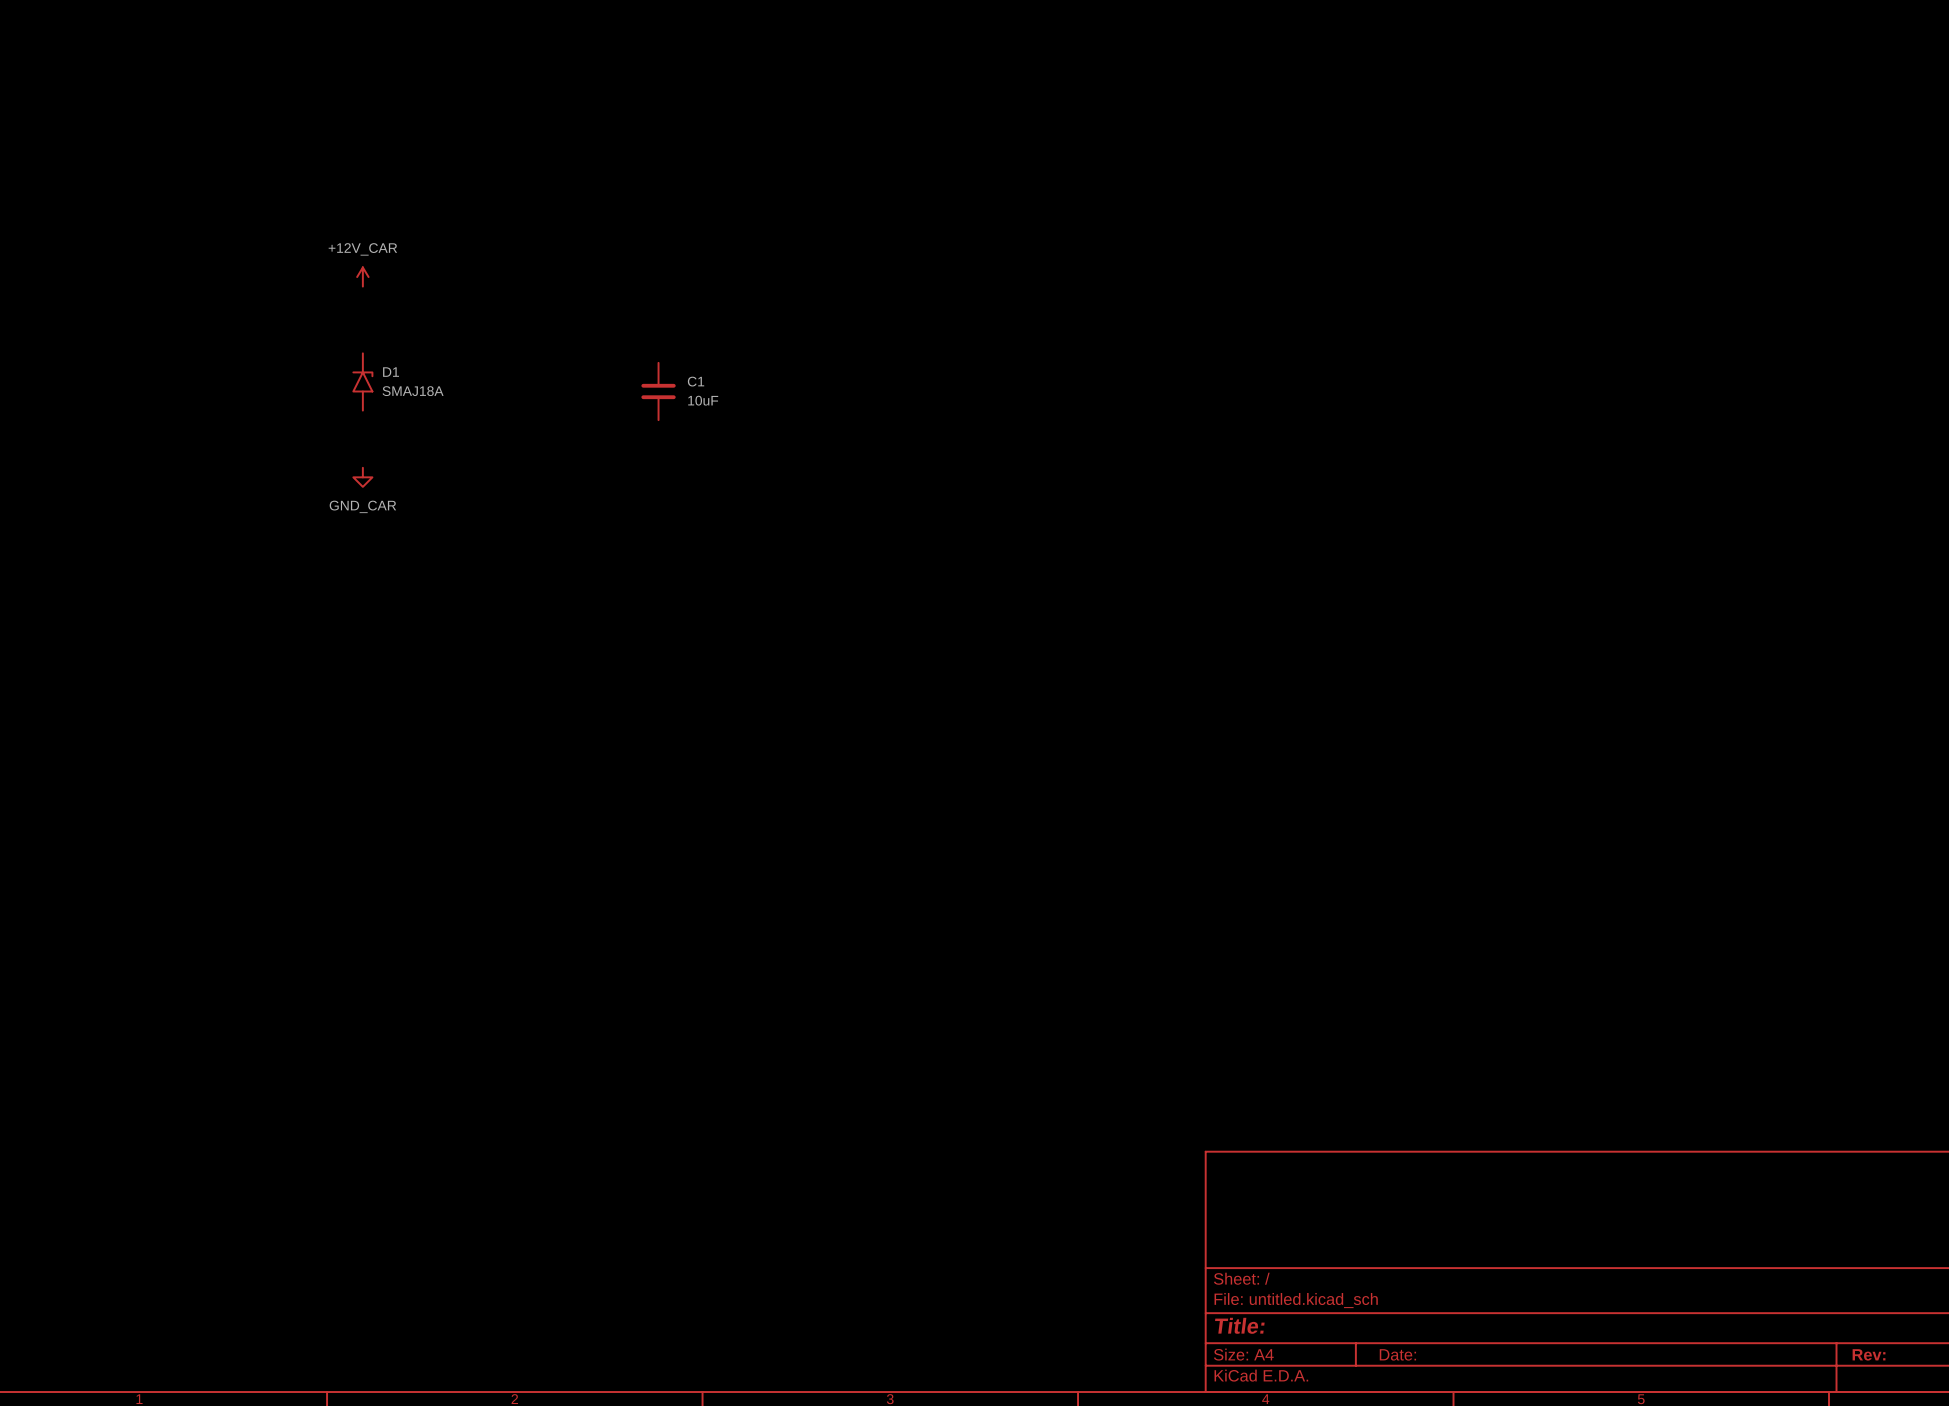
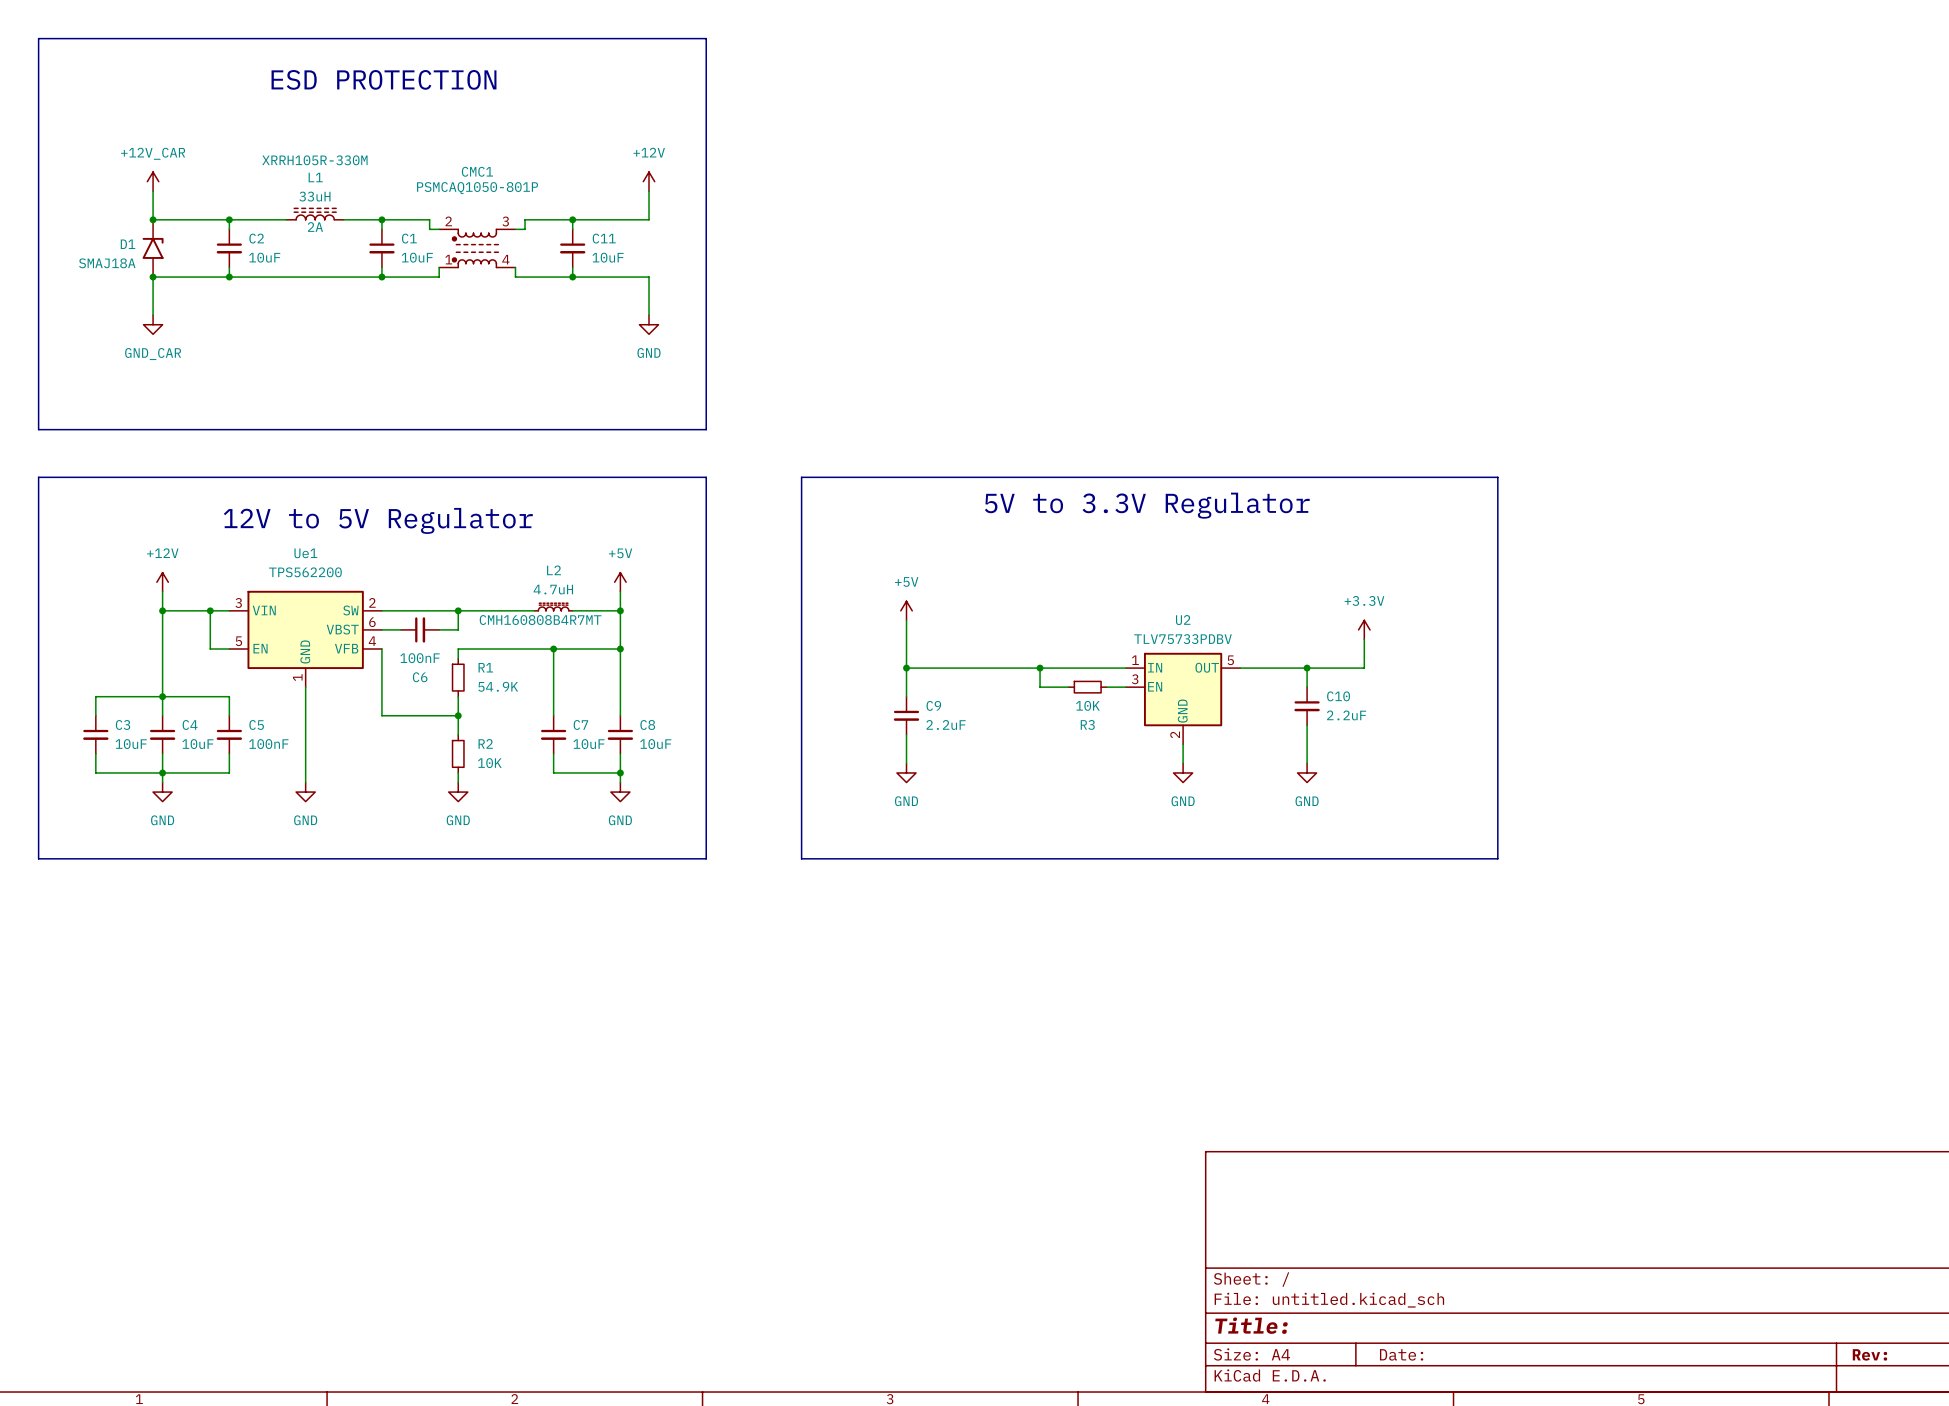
line: none -> (38, 38) (706, 38) (706, 429) (38, 429) (38, 38)
text: none -> ESD PROTECTION (384, 79)
power symbol: none -> +12V_CAR (153, 181)
power symbol: none -> +12V (649, 181)
wire: none -> (153, 191) (153, 219) (286, 219)
wire: none -> (649, 191) (649, 219) (525, 219) (525, 229) (515, 229)
L1: none -> 33uH (315, 214)
junction: none -> (153, 219)
wire: none -> (229, 219) (229, 229)
junction: none -> (229, 219)
wire: none -> (343, 219) (429, 219) (429, 229) (439, 229)
wire: none -> (381, 219) (381, 229)
junction: none -> (381, 219)
wire: none -> (572, 219) (572, 229)
junction: none -> (572, 219)
C2: none -> 10uF (229, 248)
CMC1: none -> PSMCAQ1050-801P (477, 248)
C11: none -> 10uF (572, 248)
wire: none -> (229, 267) (229, 277)
wire: none -> (381, 267) (381, 277)
wire: none -> (439, 267) (439, 277) (153, 277) (153, 315)
wire: none -> (515, 267) (515, 277) (649, 277) (649, 315)
wire: none -> (572, 267) (572, 277)
junction: none -> (153, 277)
junction: none -> (229, 277)
power symbol: +12V_CAR (362, 277) -> none
junction: none -> (381, 277)
junction: none -> (572, 277)
power symbol: none -> GND_CAR (153, 324)
power symbol: none -> GND (649, 324)
C1 symbol: [641, 362, 676, 421] -> [369, 229, 395, 268]
D1 name position: D1 (391, 372) -> D1 (128, 244)
D1 position: (362, 381) -> (153, 248)
D1 value position: SMAJ18A (413, 391) -> SMAJ18A (107, 263)
line: none -> (38, 477) (38, 858) (706, 858) (706, 477) (38, 477)
power symbol: GND_CAR (362, 477) -> none
line: none -> (801, 477) (1497, 477) (1497, 858) (801, 858) (801, 477)
text: none -> 5V to 3.3V Regulator (1147, 505)
text: none -> 12V to 5V Regulator (378, 520)
power symbol: none -> +12V (162, 582)
power symbol: none -> +5V (620, 582)
wire: none -> (162, 591) (162, 715)
wire: none -> (620, 591) (620, 715)
L2: none -> 4.7uH (553, 607)
wire: none -> (162, 610) (229, 610)
junction: none -> (162, 610)
wire: none -> (210, 610) (210, 649) (229, 649)
junction: none -> (210, 610)
wire: none -> (381, 610) (534, 610)
wire: none -> (458, 610) (458, 629) (439, 629)
junction: none -> (458, 610)
wire: none -> (572, 610) (620, 610)
junction: none -> (620, 610)
power symbol: none -> +5V (906, 610)
wire: none -> (906, 620) (906, 696)
wire: none -> (381, 629) (401, 629)
C6: none -> 100nF (420, 629)
power symbol: none -> +3.3V (1364, 629)
Ue1: none -> TPS562200 (305, 638)
wire: none -> (1364, 639) (1364, 668) (1240, 668)
wire: none -> (381, 649) (381, 715) (458, 715)
wire: none -> (553, 649) (553, 715)
junction: none -> (553, 649)
wire: none -> (620, 649) (458, 649) (458, 658)
junction: none -> (620, 649)
wire: none -> (906, 668) (1125, 668)
junction: none -> (906, 668)
wire: none -> (1040, 668) (1040, 687) (1068, 687)
junction: none -> (1040, 668)
wire: none -> (1307, 668) (1307, 687)
junction: none -> (1307, 668)
R1: none -> 54.9K (458, 677)
wire: none -> (305, 687) (305, 782)
R3: none -> 10K (1087, 687)
wire: none -> (1106, 687) (1125, 687)
junction: none -> (162, 696)
wire: none -> (458, 696) (458, 734)
U2: none -> TLV75733PDBV (1183, 698)
C10: none -> 2.2uF (1307, 706)
wire: none -> (95, 715) (95, 696) (229, 696) (229, 715)
junction: none -> (458, 715)
C9: none -> 2.2uF (906, 715)
wire: none -> (1307, 725) (1307, 763)
C3: none -> 10uF (95, 734)
C4: none -> 10uF (162, 734)
C5: none -> 100nF (229, 734)
C7: none -> 10uF (553, 734)
C8: none -> 10uF (620, 734)
wire: none -> (906, 734) (906, 763)
wire: none -> (1183, 744) (1183, 763)
wire: none -> (95, 753) (95, 772) (229, 772) (229, 753)
wire: none -> (162, 753) (162, 782)
R2: none -> 10K (458, 753)
wire: none -> (553, 753) (553, 772) (620, 772)
wire: none -> (620, 753) (620, 782)
junction: none -> (162, 772)
wire: none -> (458, 772) (458, 782)
junction: none -> (620, 772)
power symbol: none -> GND (906, 772)
power symbol: none -> GND (1183, 772)
power symbol: none -> GND (1307, 772)
power symbol: none -> GND (162, 792)
power symbol: none -> GND (305, 792)
power symbol: none -> GND (458, 792)
power symbol: none -> GND (620, 792)

